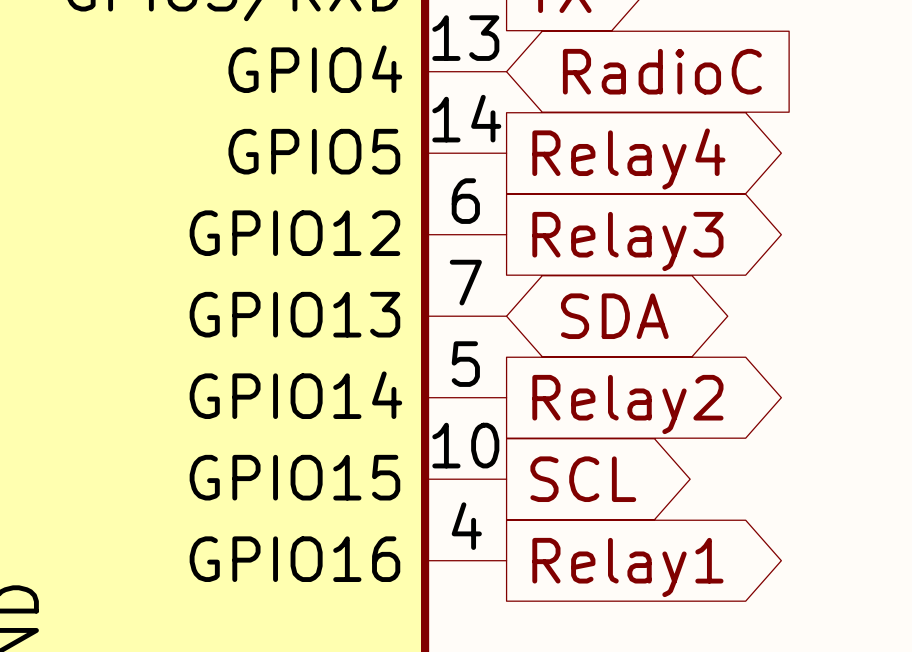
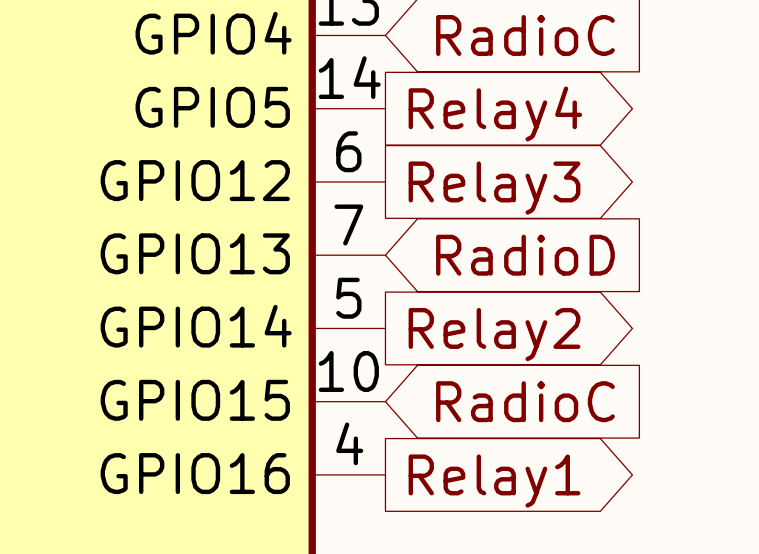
global label shape: bidirectional (614, 316) -> input (525, 255)
global label: SDA (614, 316) -> RadioD (525, 255)
global label shape: output (583, 479) -> input (525, 401)
global label: SCL (583, 479) -> RadioC (525, 401)

